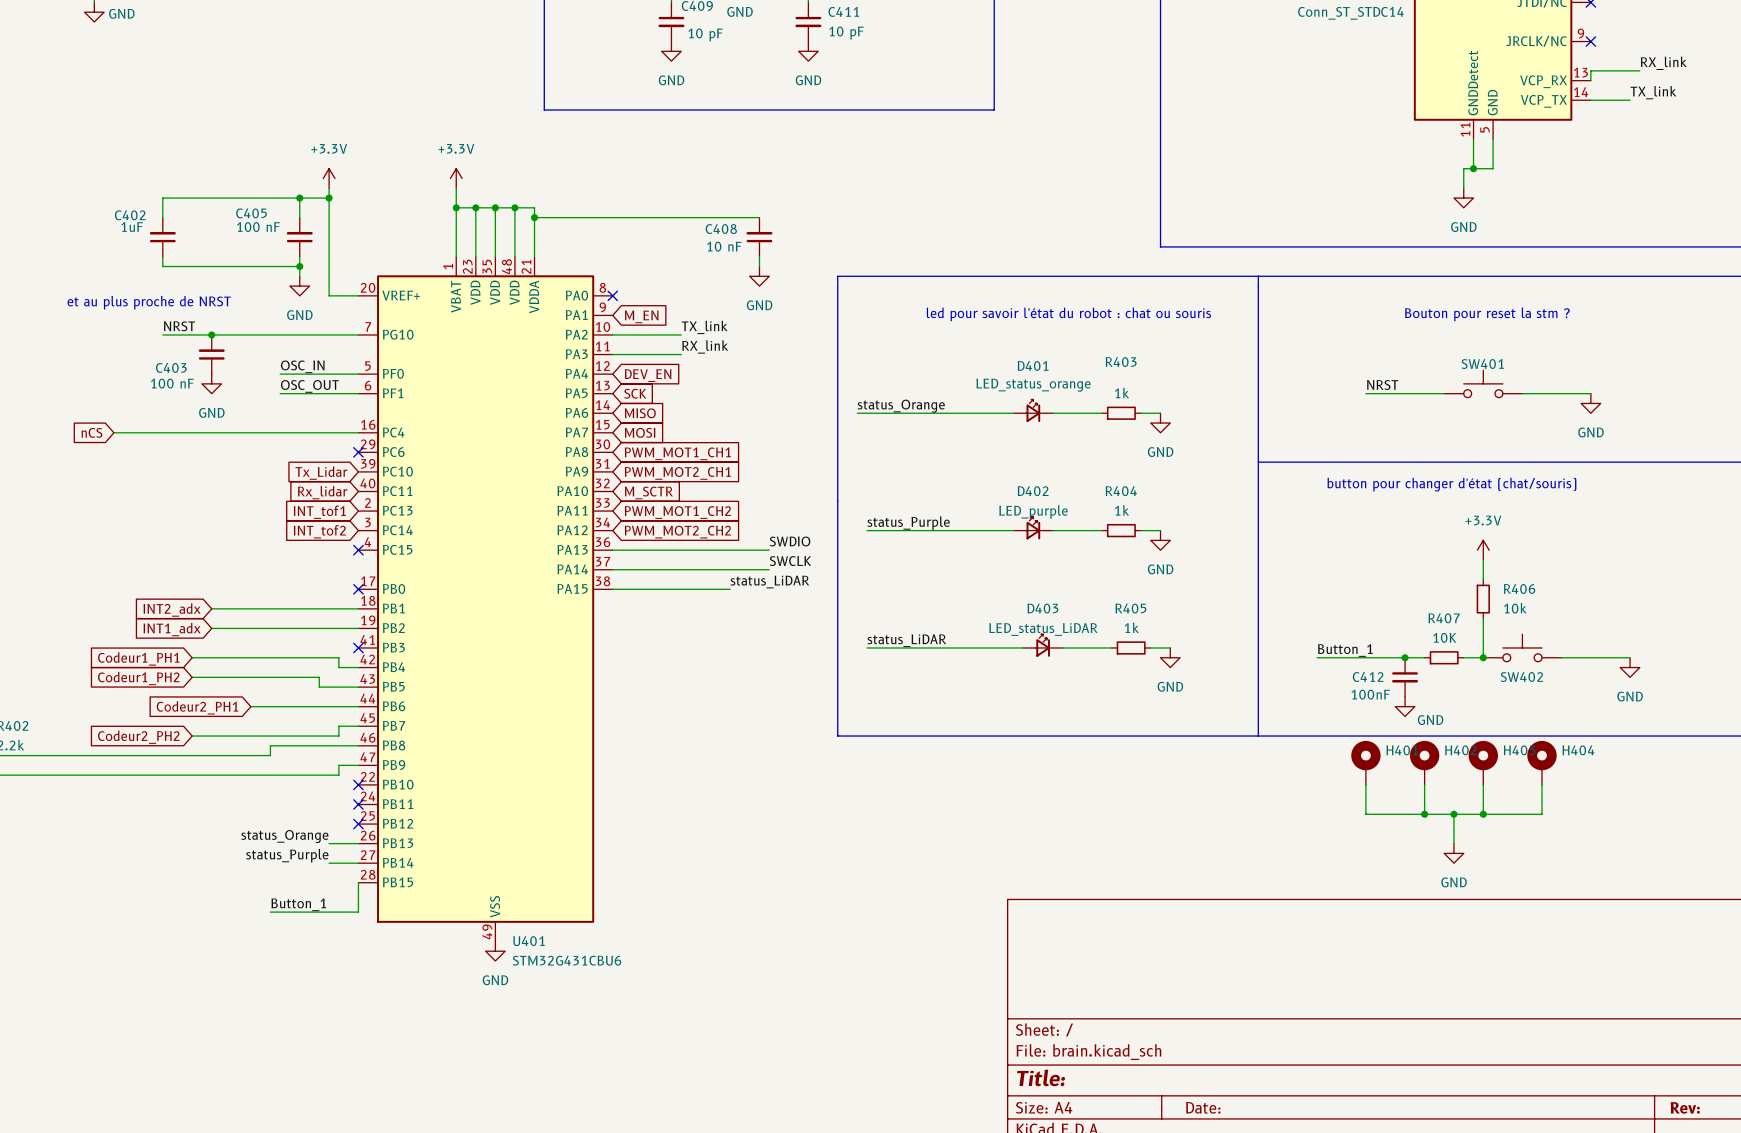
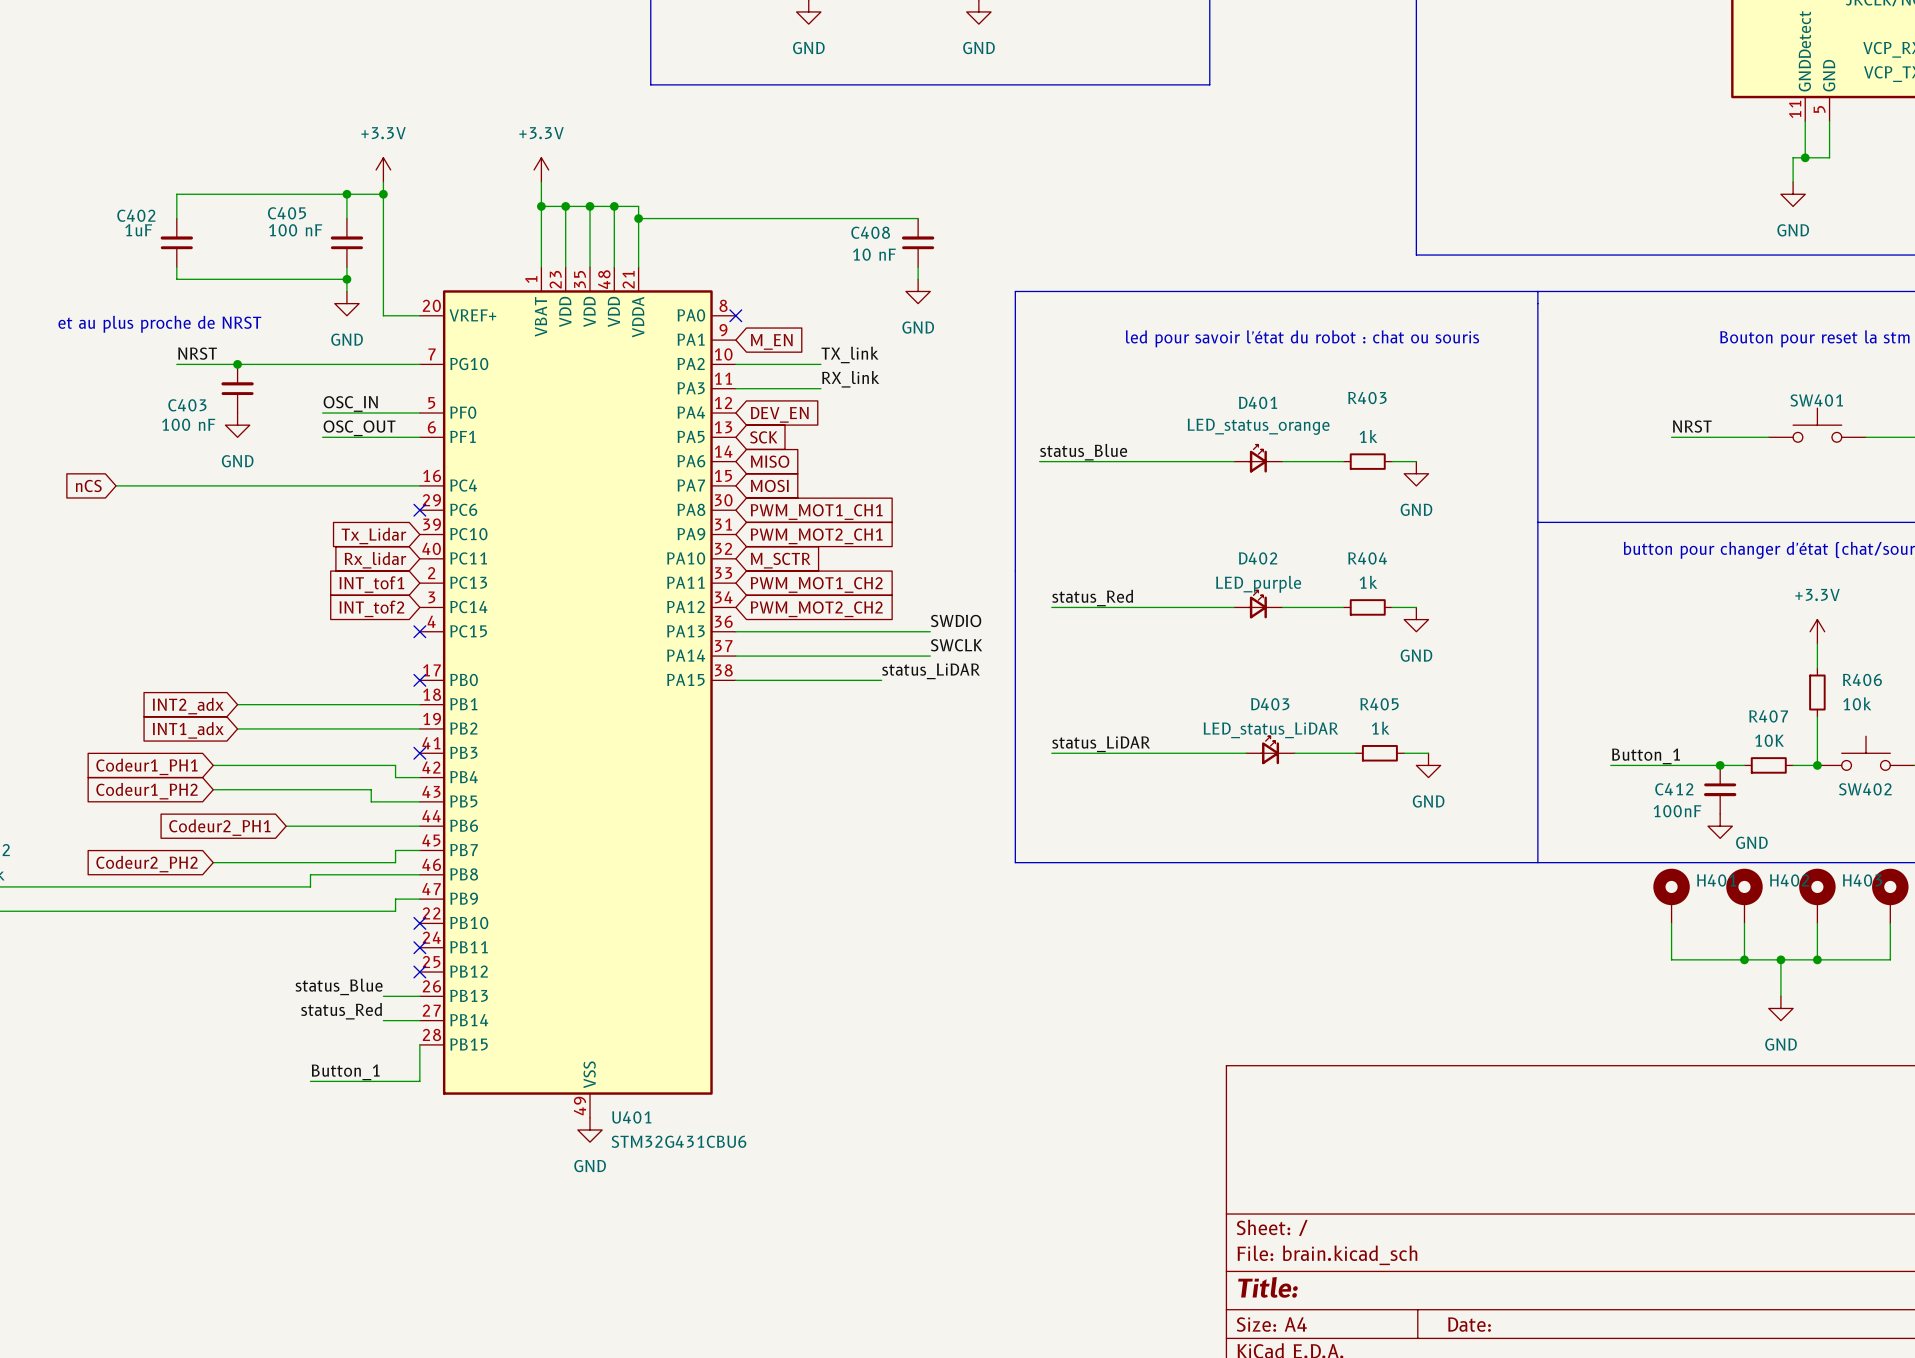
label: status_Orange (901, 406) -> status_Blue (1083, 452)
label: status_Purple (908, 523) -> status_Red (1092, 598)
label: status_Orange (284, 836) -> status_Blue (339, 986)
label: status_Purple (287, 855) -> status_Red (341, 1011)

